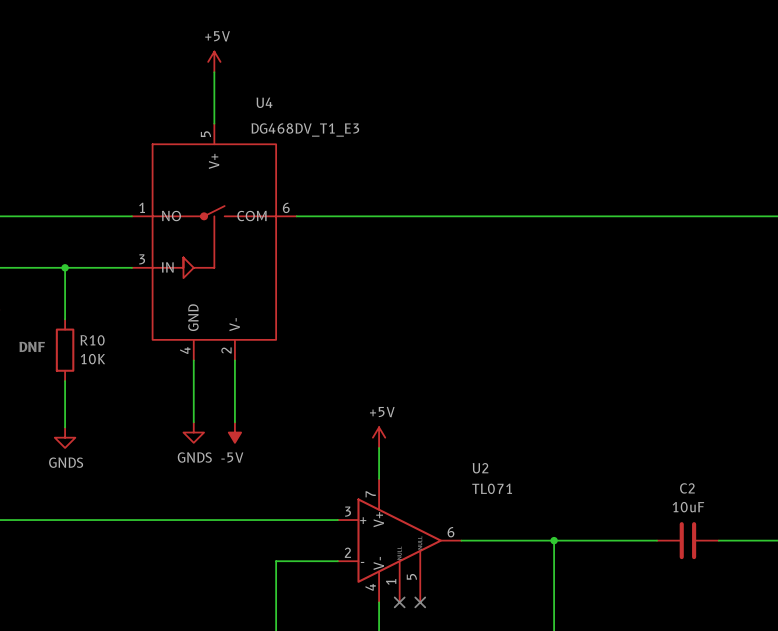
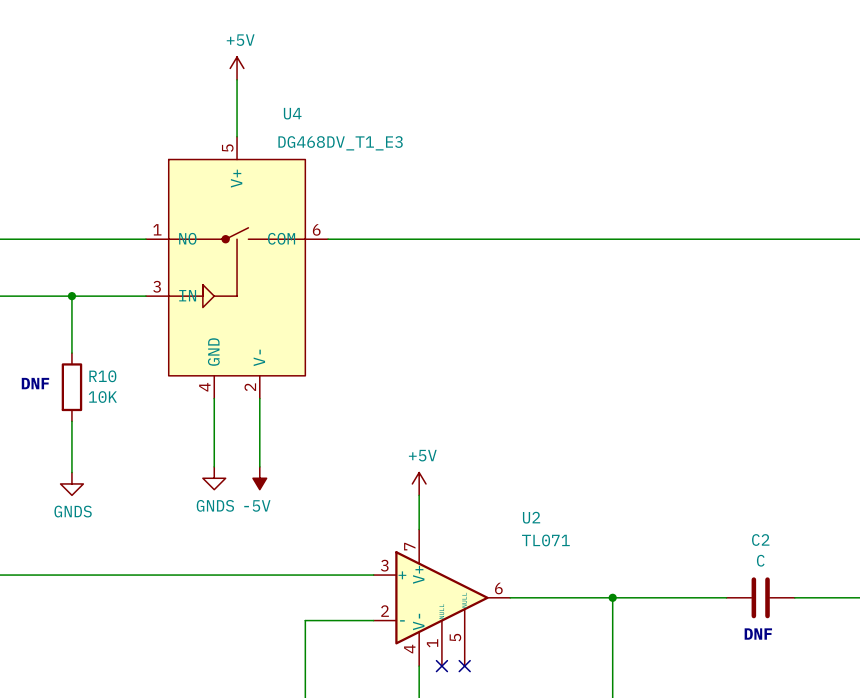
C2 value: 10uF (688, 507) -> C (760, 560)
text: none -> DNF (758, 634)

